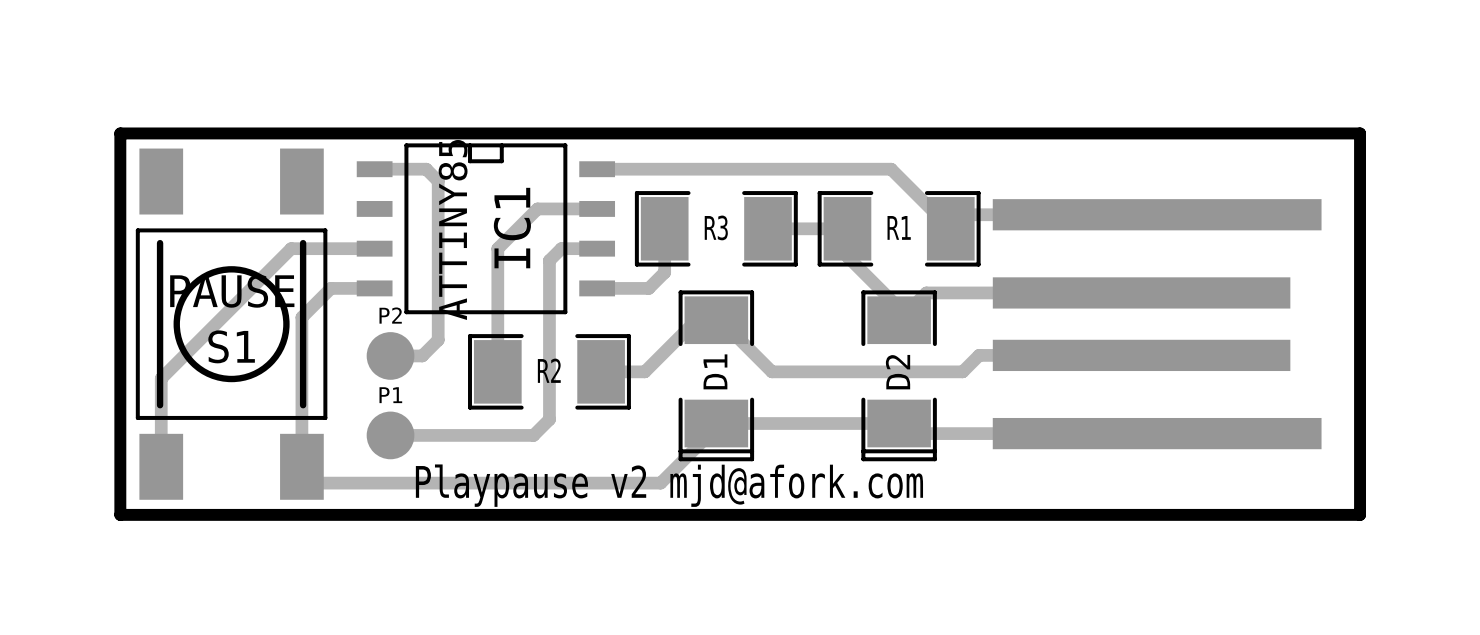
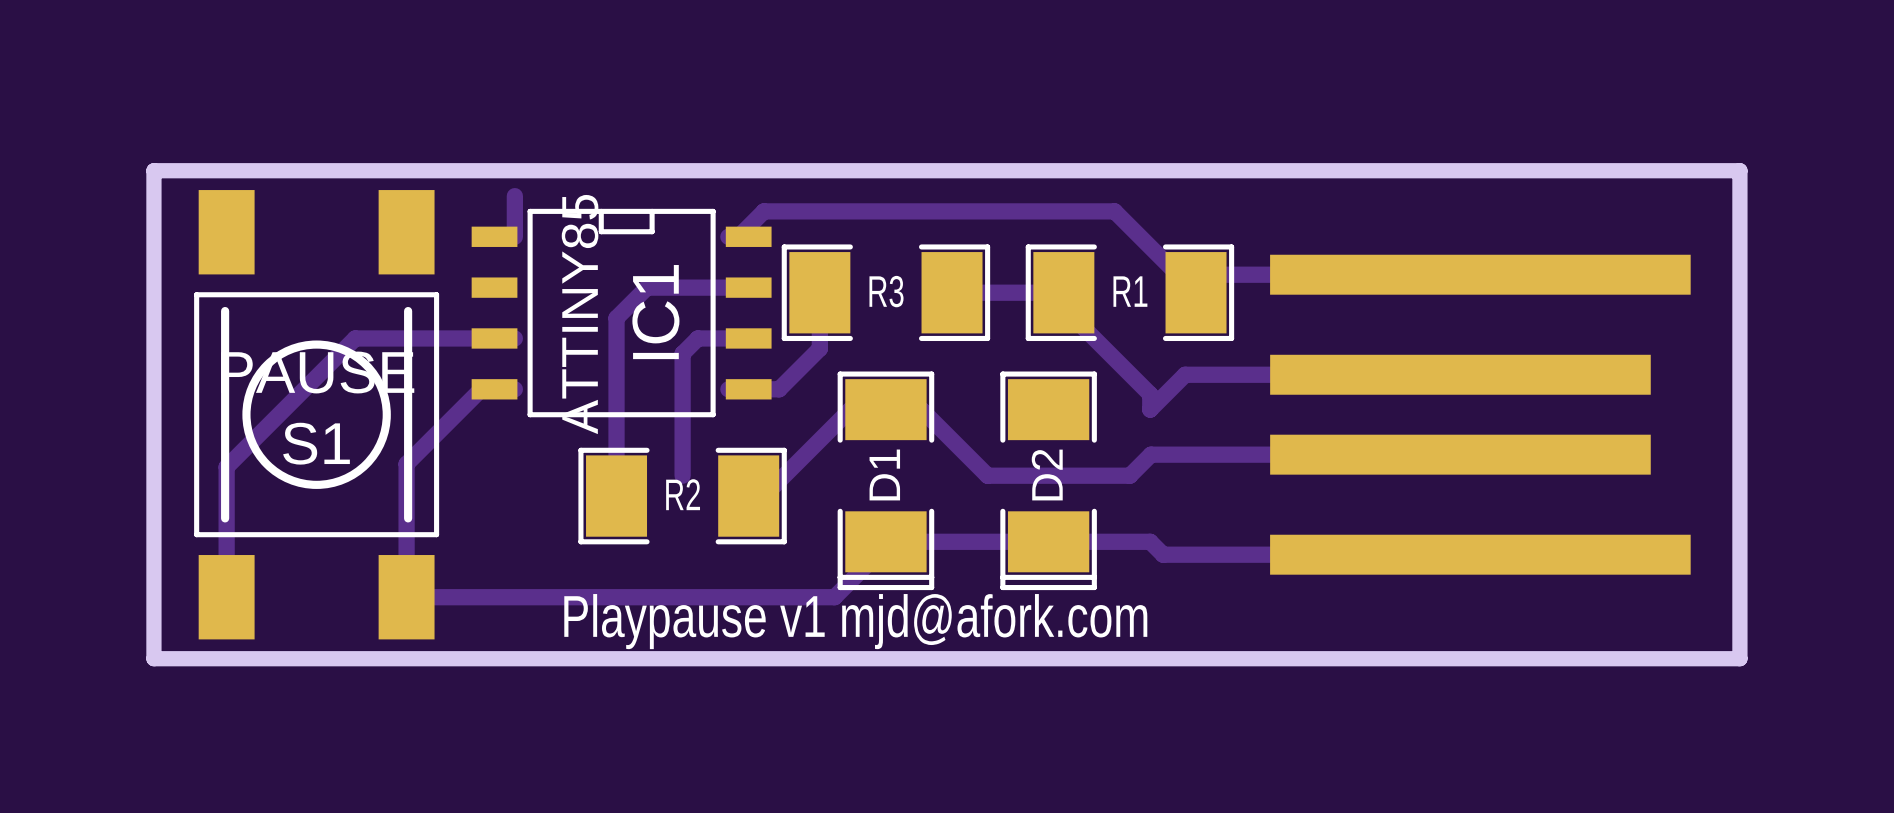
IC1 footprint: [356, 143, 616, 315] -> [471, 208, 772, 418]
track: none -> (514, 196) (514, 236)
track: (374, 169) (426, 169) (438, 181) (438, 340) (422, 355) (390, 355) -> none
track: (597, 169) (891, 169) (950, 228) (964, 214) -> (728, 236) (738, 236) (763, 211) (1114, 211) (1196, 292) (1214, 274) (1234, 274)
track: (597, 208) (537, 208) (497, 248) (497, 371) -> none
track: none -> (728, 287) (647, 287) (616, 318) (616, 496)
IC1 name position: IC1 (512, 228) -> IC1 (655, 312)
track: none -> (819, 292) (819, 348) (779, 389) (728, 389)
track: (664, 228) (664, 272) (648, 288) (597, 288) -> none
R3 position: (716, 228) -> (885, 292)
R1 position: (899, 228) -> (1129, 292)
IC1 value position: ATTINY85 (453, 229) -> ATTINY85 (580, 314)
track: (374, 248) (291, 248) (161, 378) (161, 466) -> none
track: (597, 248) (561, 248) (549, 260) (549, 419) (533, 435) (390, 435) -> none
track: none -> (514, 338) (355, 338) (226, 467) (226, 597)
track: none -> (728, 338) (697, 338) (682, 353) (682, 475)
track: (374, 288) (330, 288) (301, 317) (301, 473) (311, 483) (660, 483) (716, 427) (716, 423) -> (514, 389) (481, 389) (406, 464) (406, 597) (834, 597) (885, 545) (885, 541) (916, 541)
track: (696, 320) (644, 371) (601, 371) -> (891, 409) (850, 409) (763, 496) (748, 496)
S1 position: (231, 324) -> (316, 414)
P2: (390, 355) -> none
track: (979, 355) (962, 371) (883, 371) -> (1252, 454) (1150, 454) (1129, 475)
R2 position: (549, 371) -> (682, 496)
D1 position: (716, 375) -> (885, 480)
D2 position: (899, 375) -> (1048, 480)
P1: (390, 435) -> none
text: Playpause v2 mjd@afork.com (669, 485) -> Playpause v1 mjd@afork.com (855, 621)

